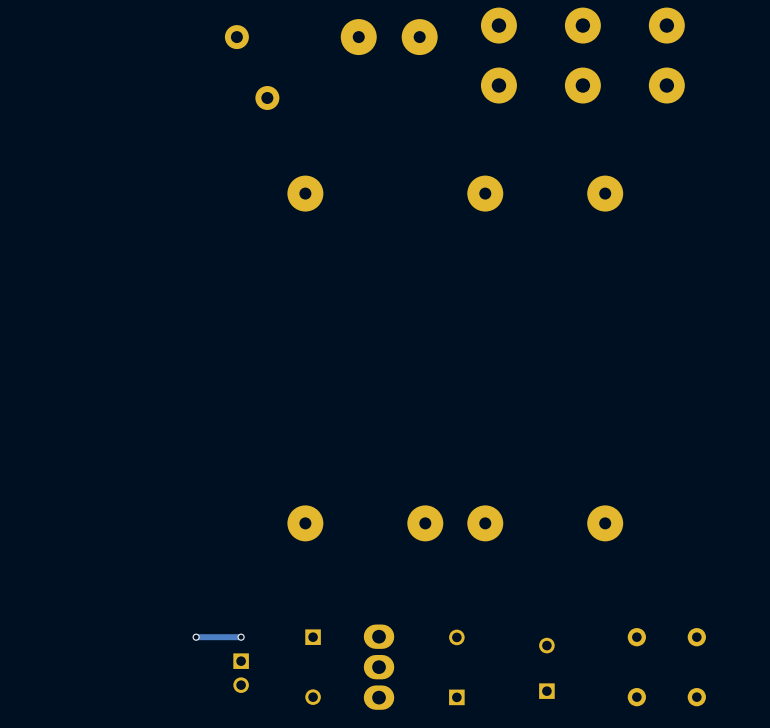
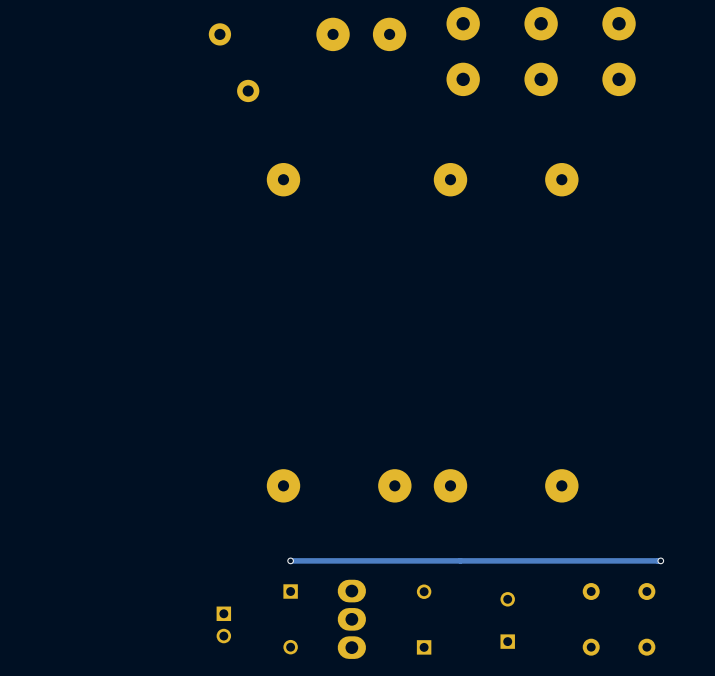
via: none -> (290, 560)
track: none -> (660, 560) (290, 560)
via: none -> (660, 560)
via: (196, 637) -> none
track: (241, 637) (196, 637) -> none
via: (241, 637) -> none

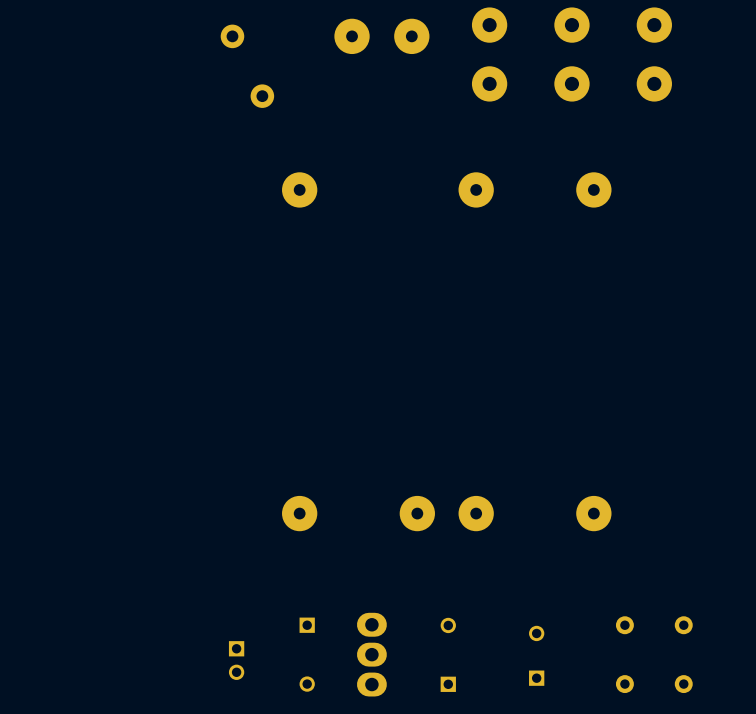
via: (290, 560) -> none
track: (660, 560) (290, 560) -> none
via: (660, 560) -> none

